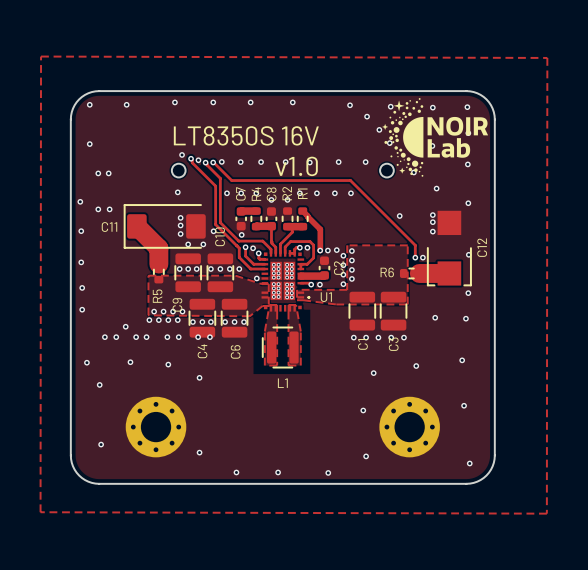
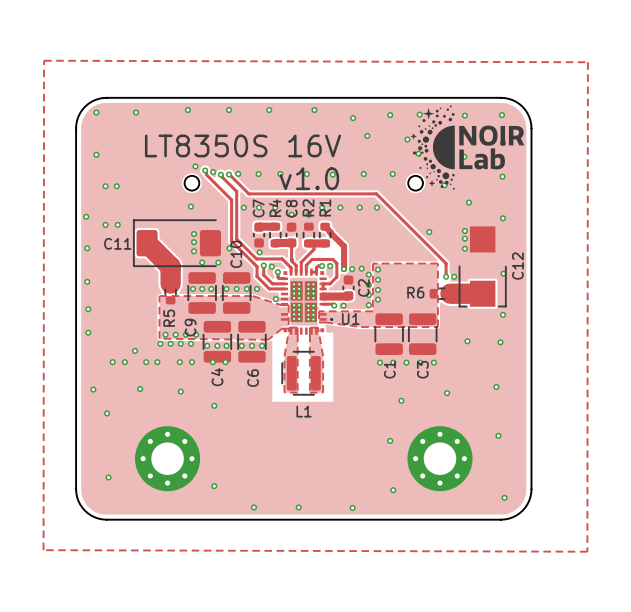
via: (350, 105) -> none
via: none -> (390, 115)
via: none -> (353, 118)
via: (367, 116) -> none
via: none -> (367, 135)

